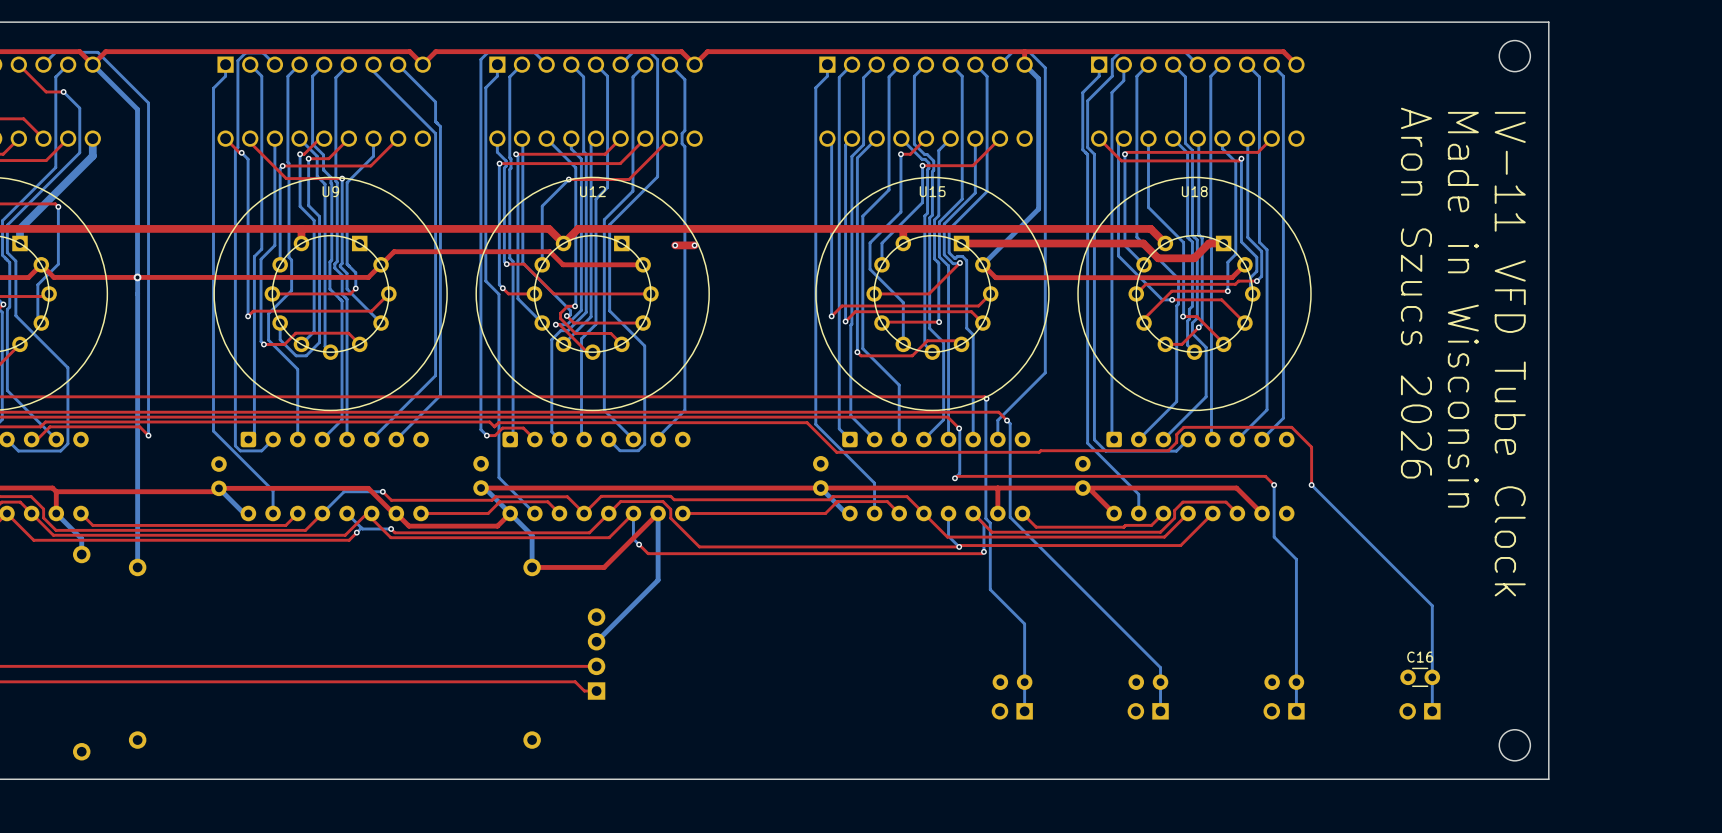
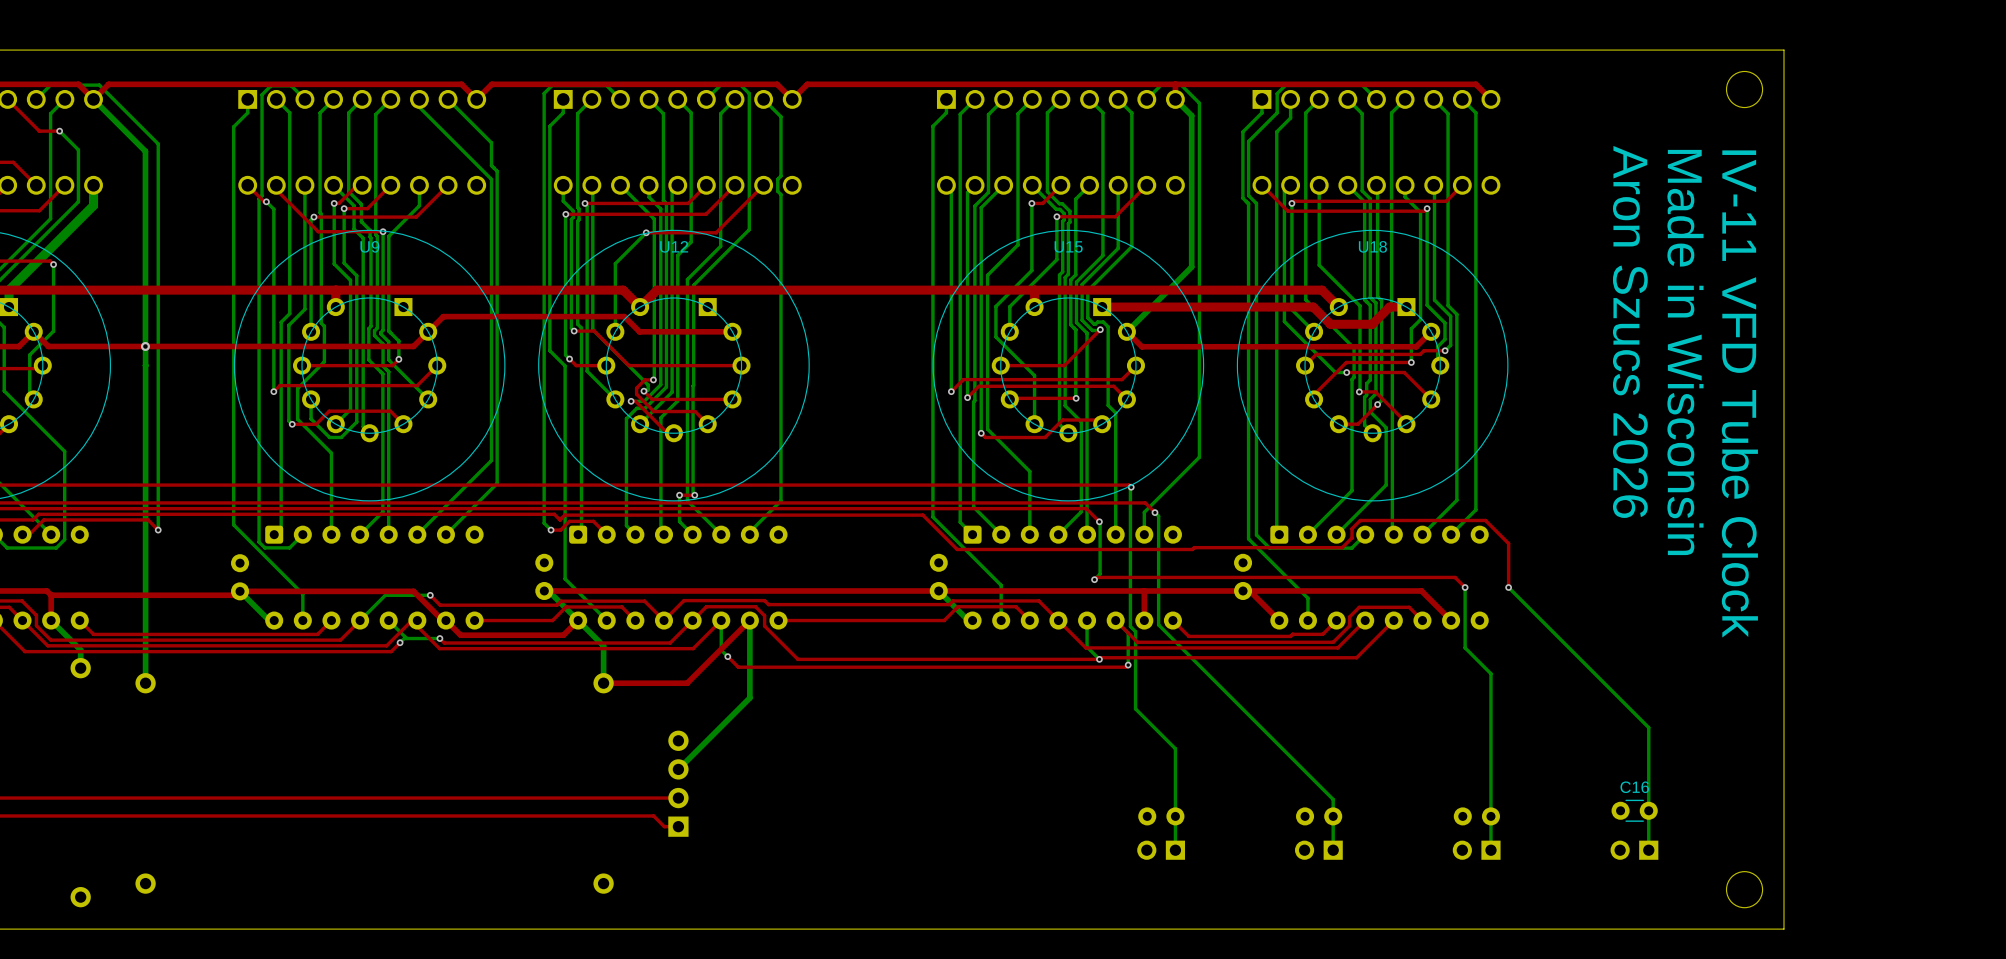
top track: (675, 245) (694, 245) -> none
via: (675, 245) -> none
via: (694, 245) -> none
bottom track: (609, 310) (644, 345) (644, 444) (638, 450) (620, 450) (608, 439) -> (693, 385) (693, 495) (694, 495)
top track: none -> (679, 495) (694, 495)
bottom track: none -> (679, 495) (679, 521) (692, 534)
via: none -> (679, 495)
via: none -> (694, 495)

